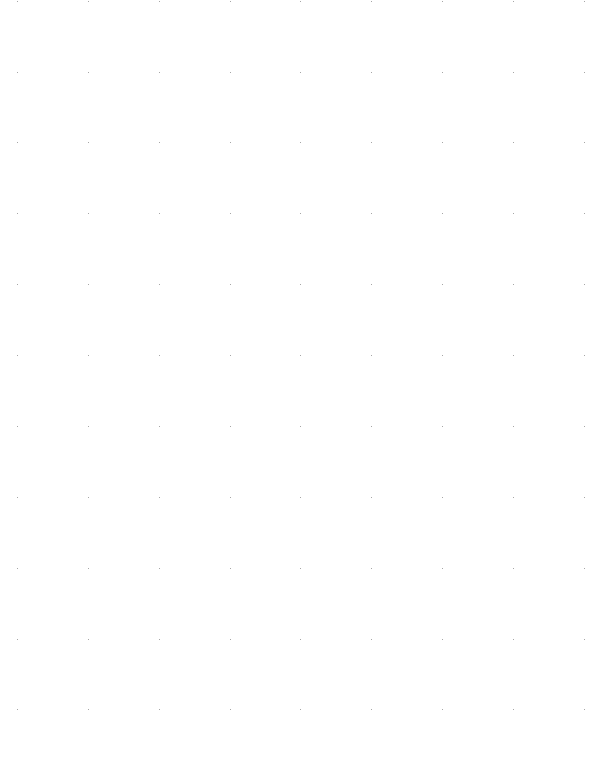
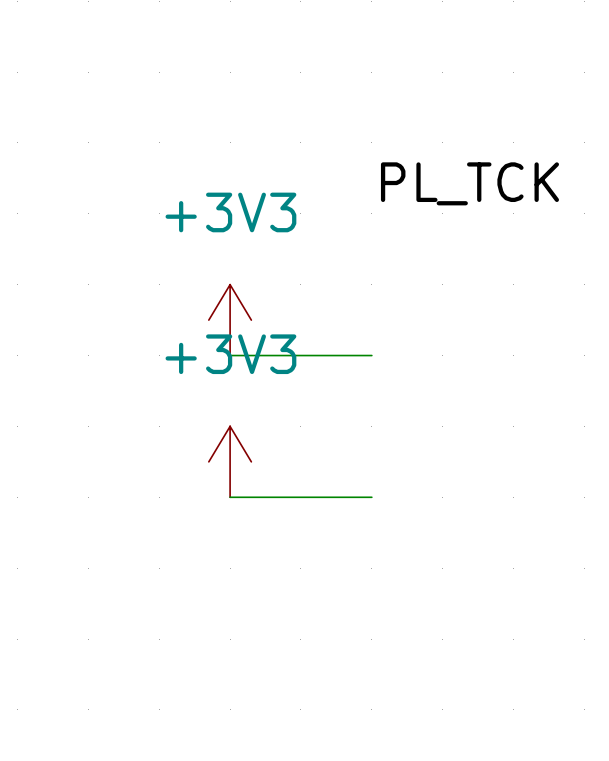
label: none -> PL_TCK (469, 183)
power symbol: none -> +3V3 (230, 320)
wire: none -> (230, 355) (371, 355)
power symbol: none -> +3V3 (230, 461)
wire: none -> (230, 497) (371, 497)

